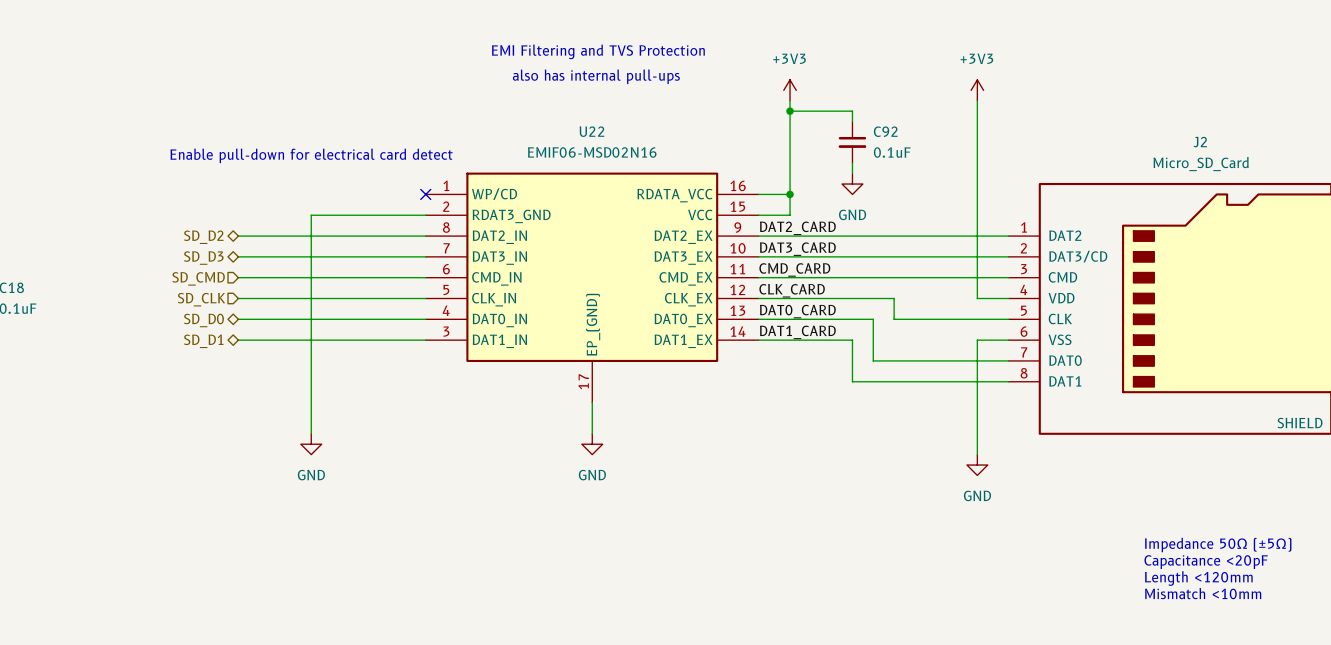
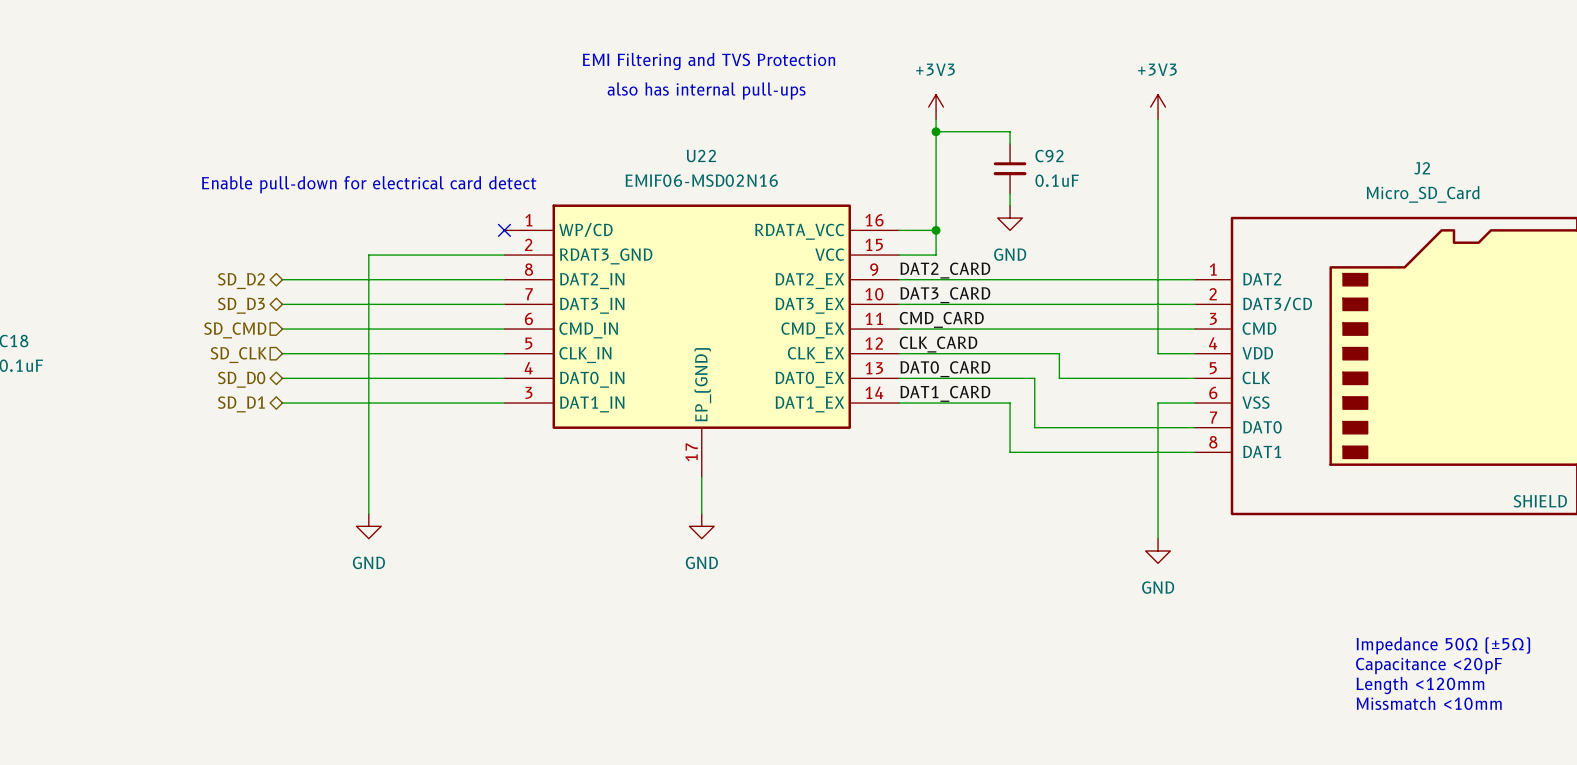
text: Mismatch <10mm (1203, 593) -> Missmatch <10mm (1429, 703)

